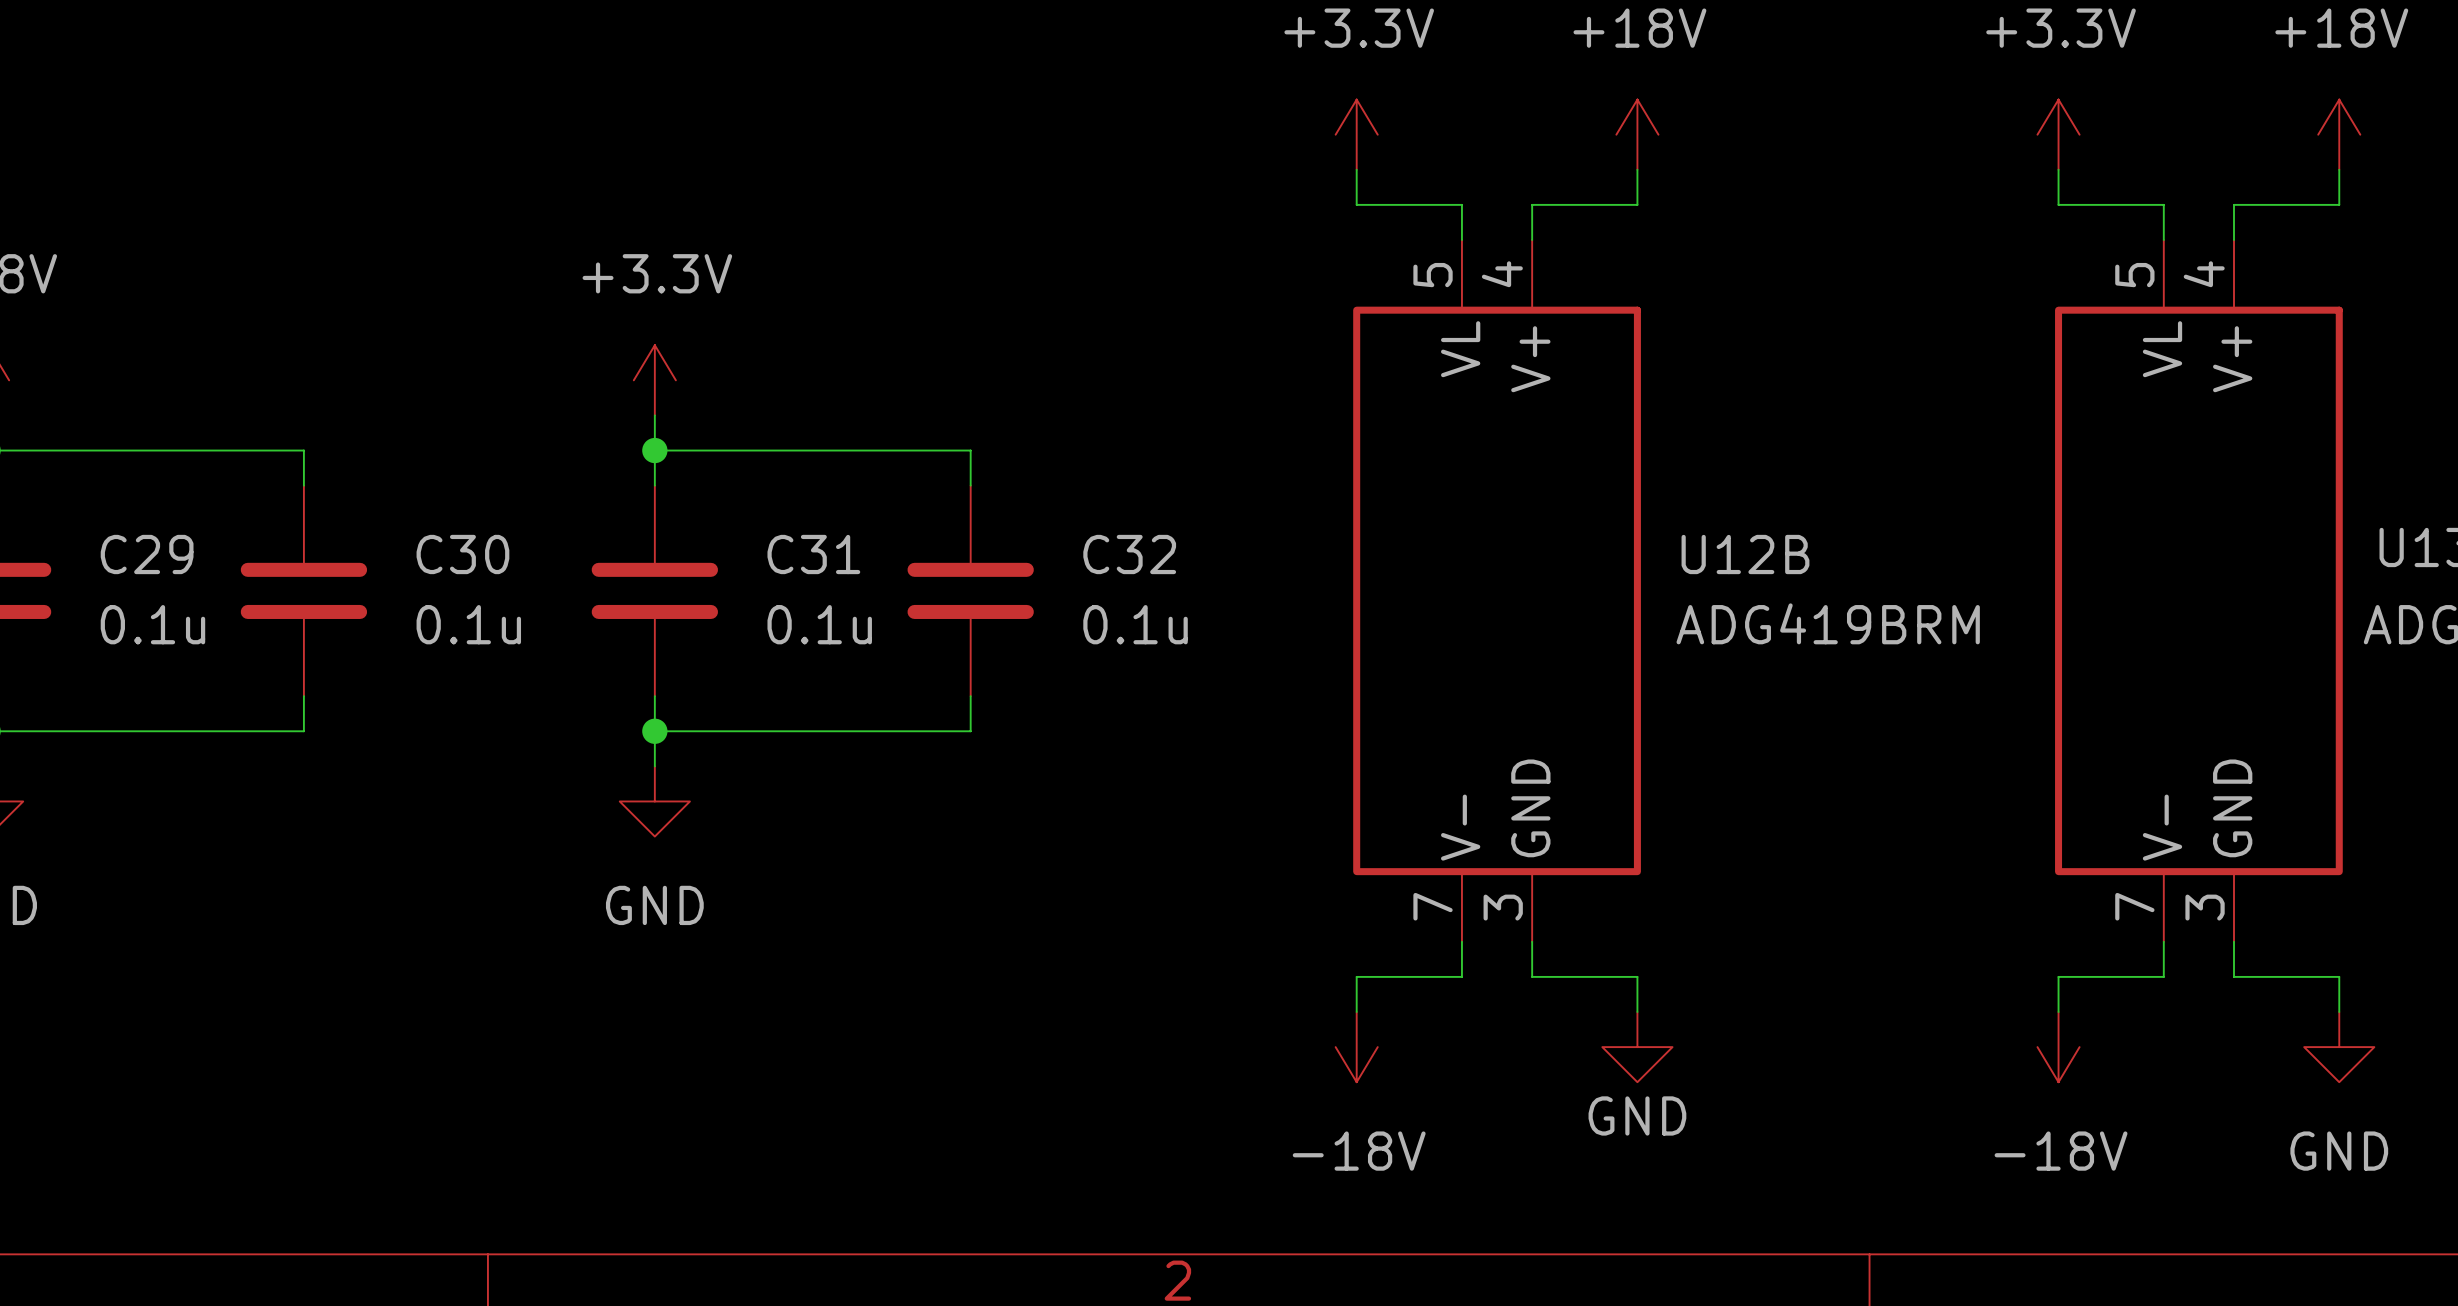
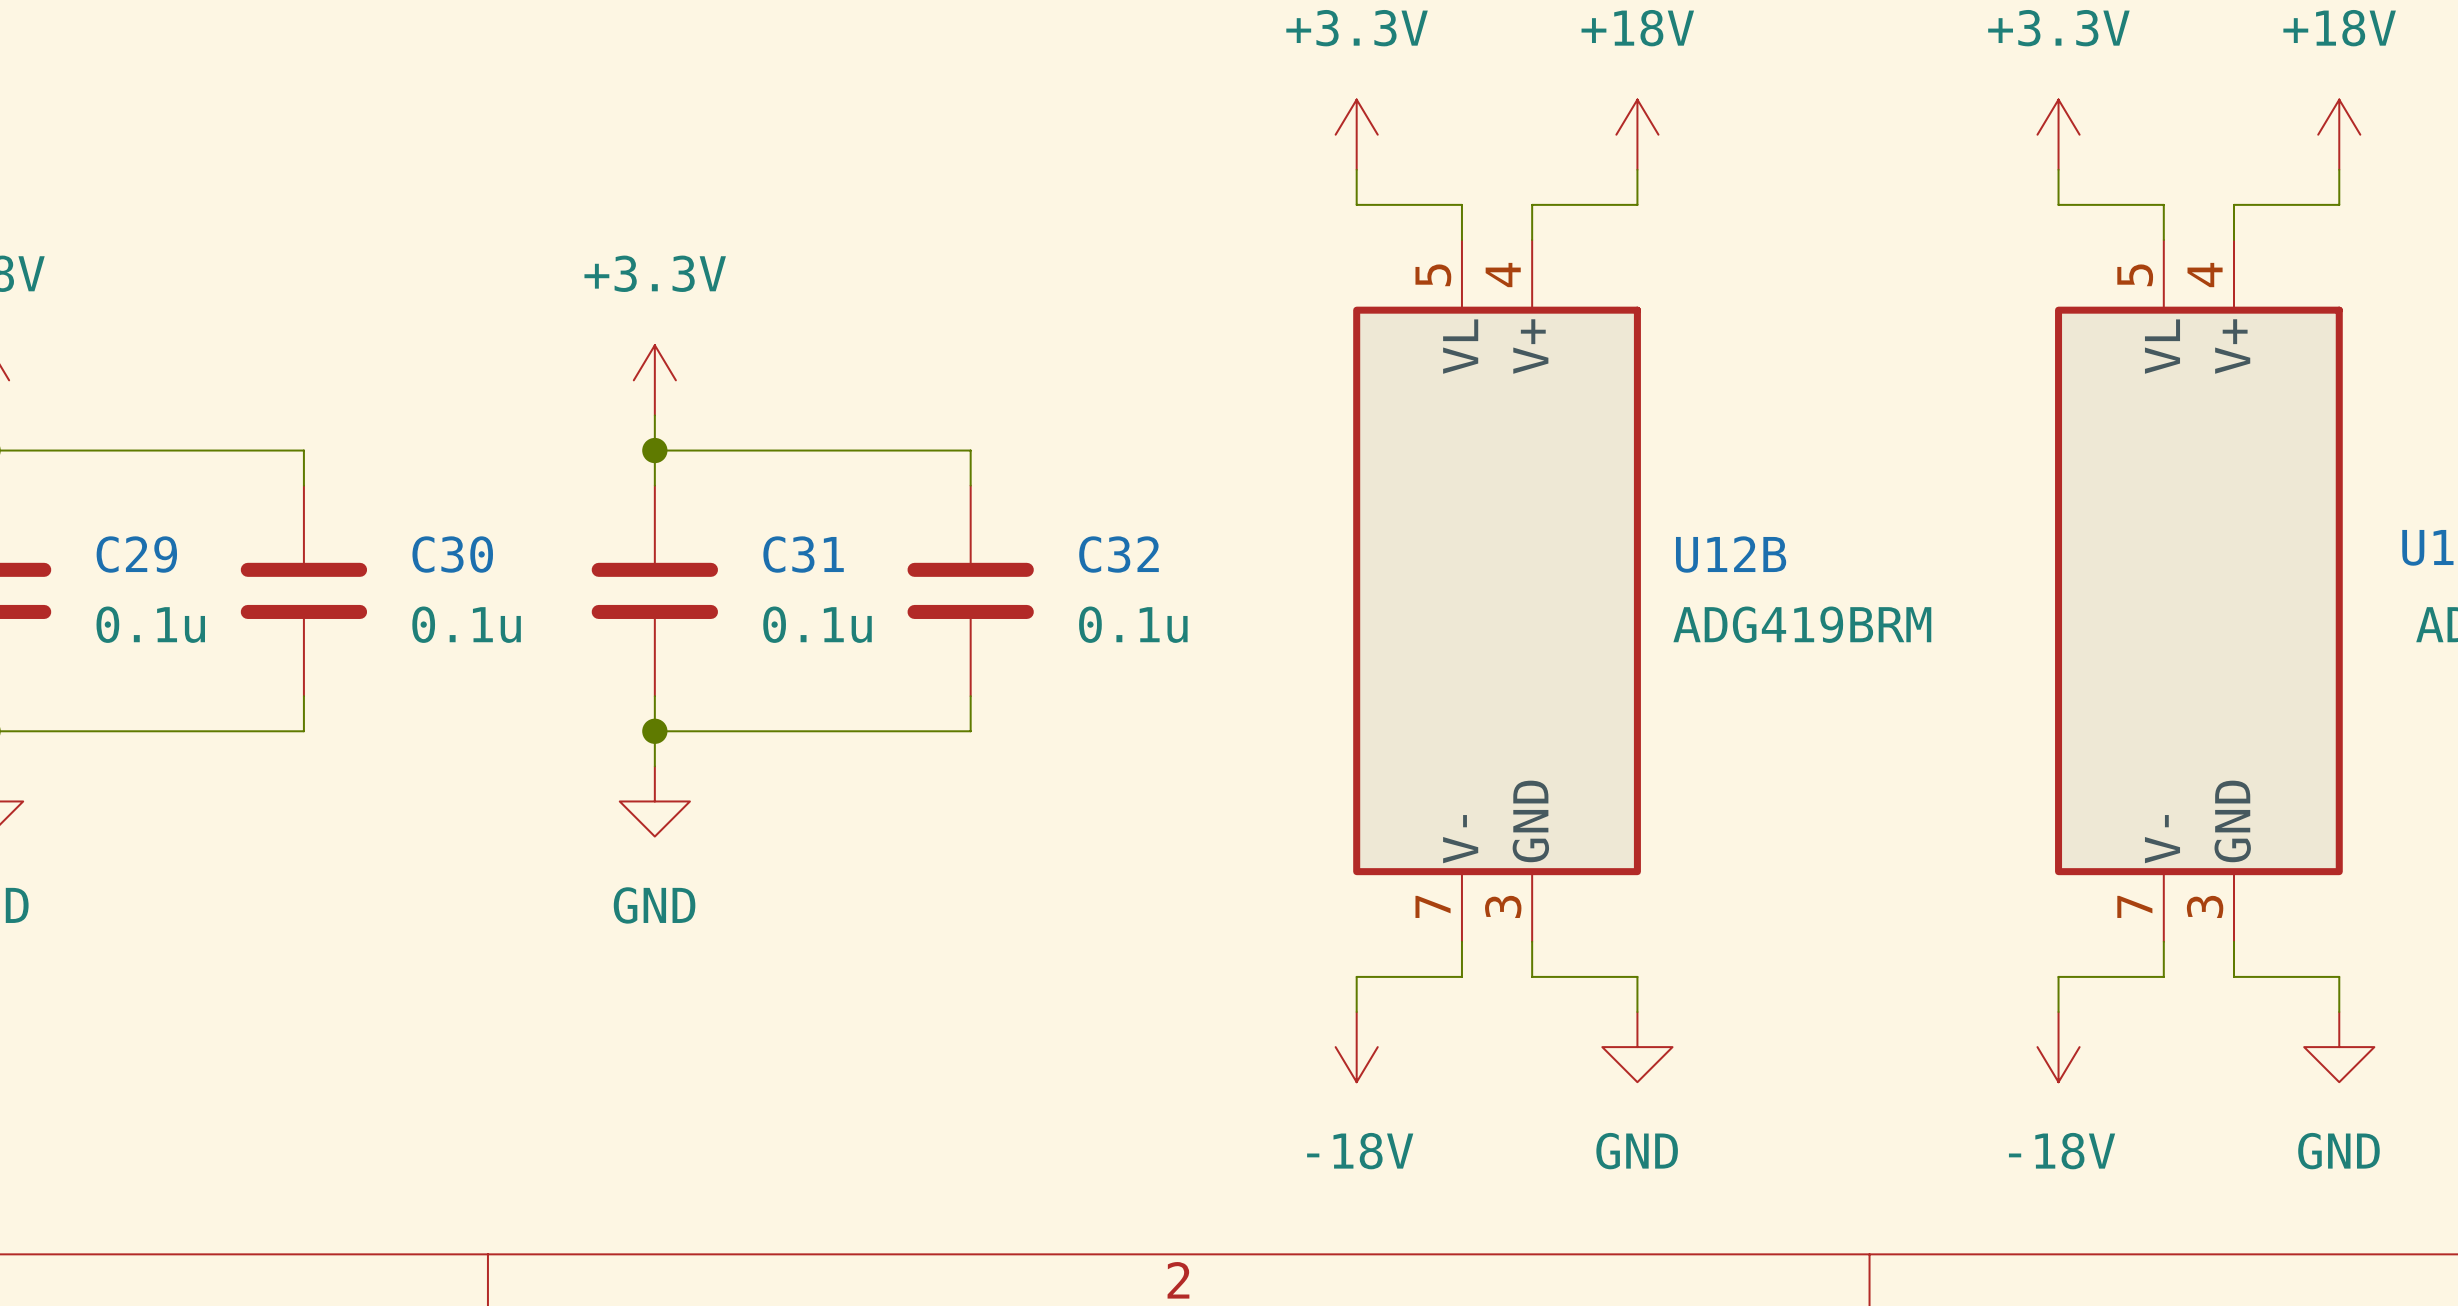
power symbol text position: GND (1637, 1115) -> GND (1637, 1151)

